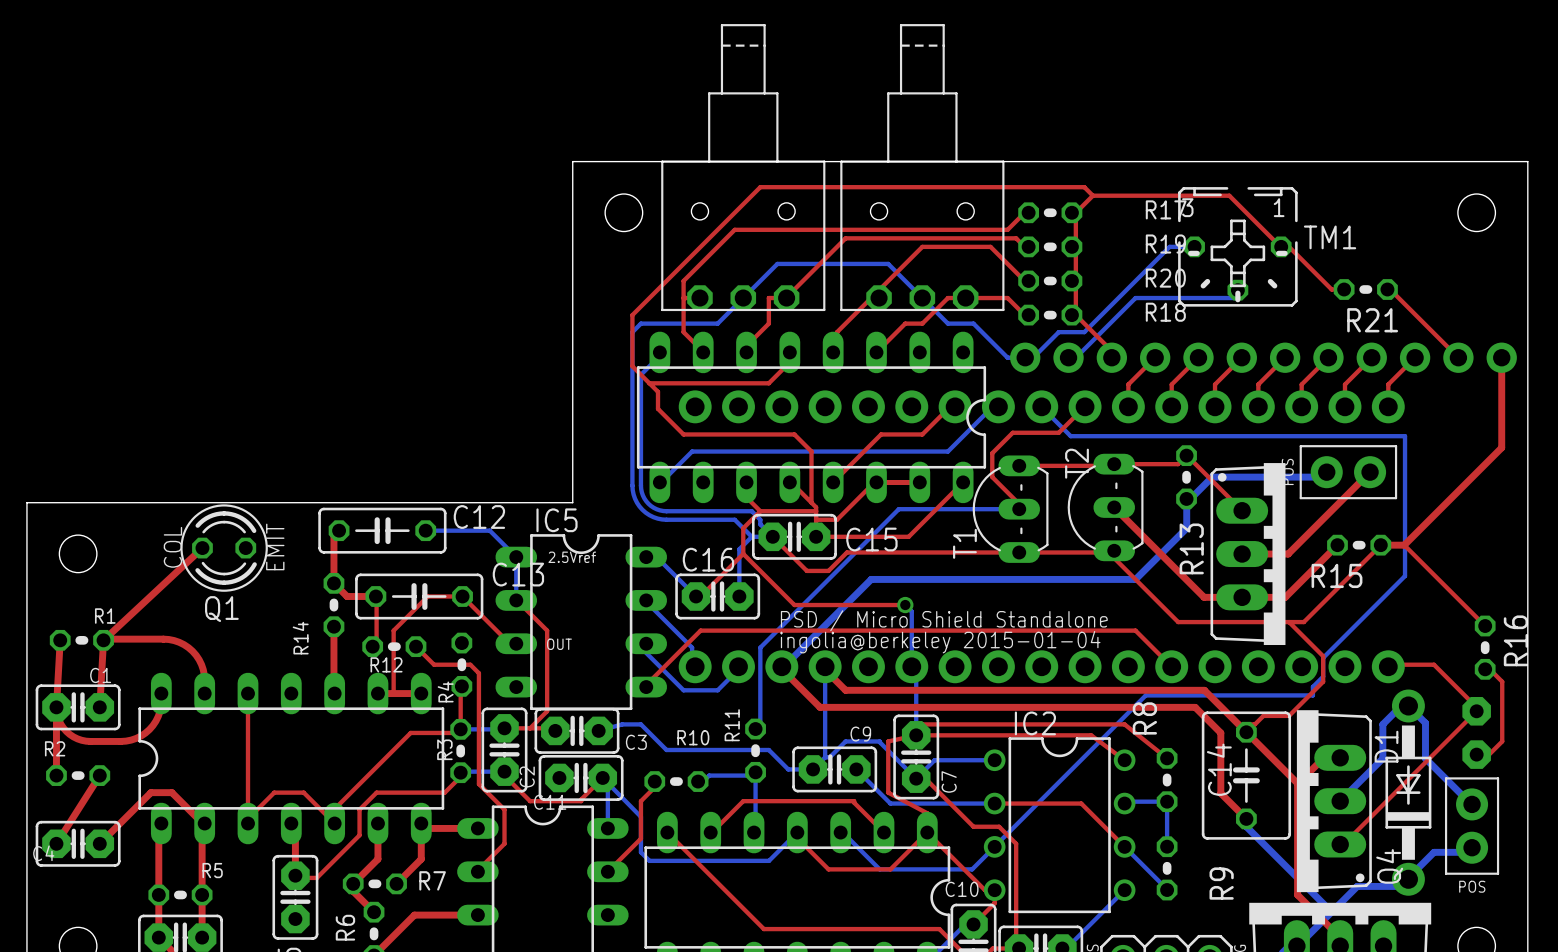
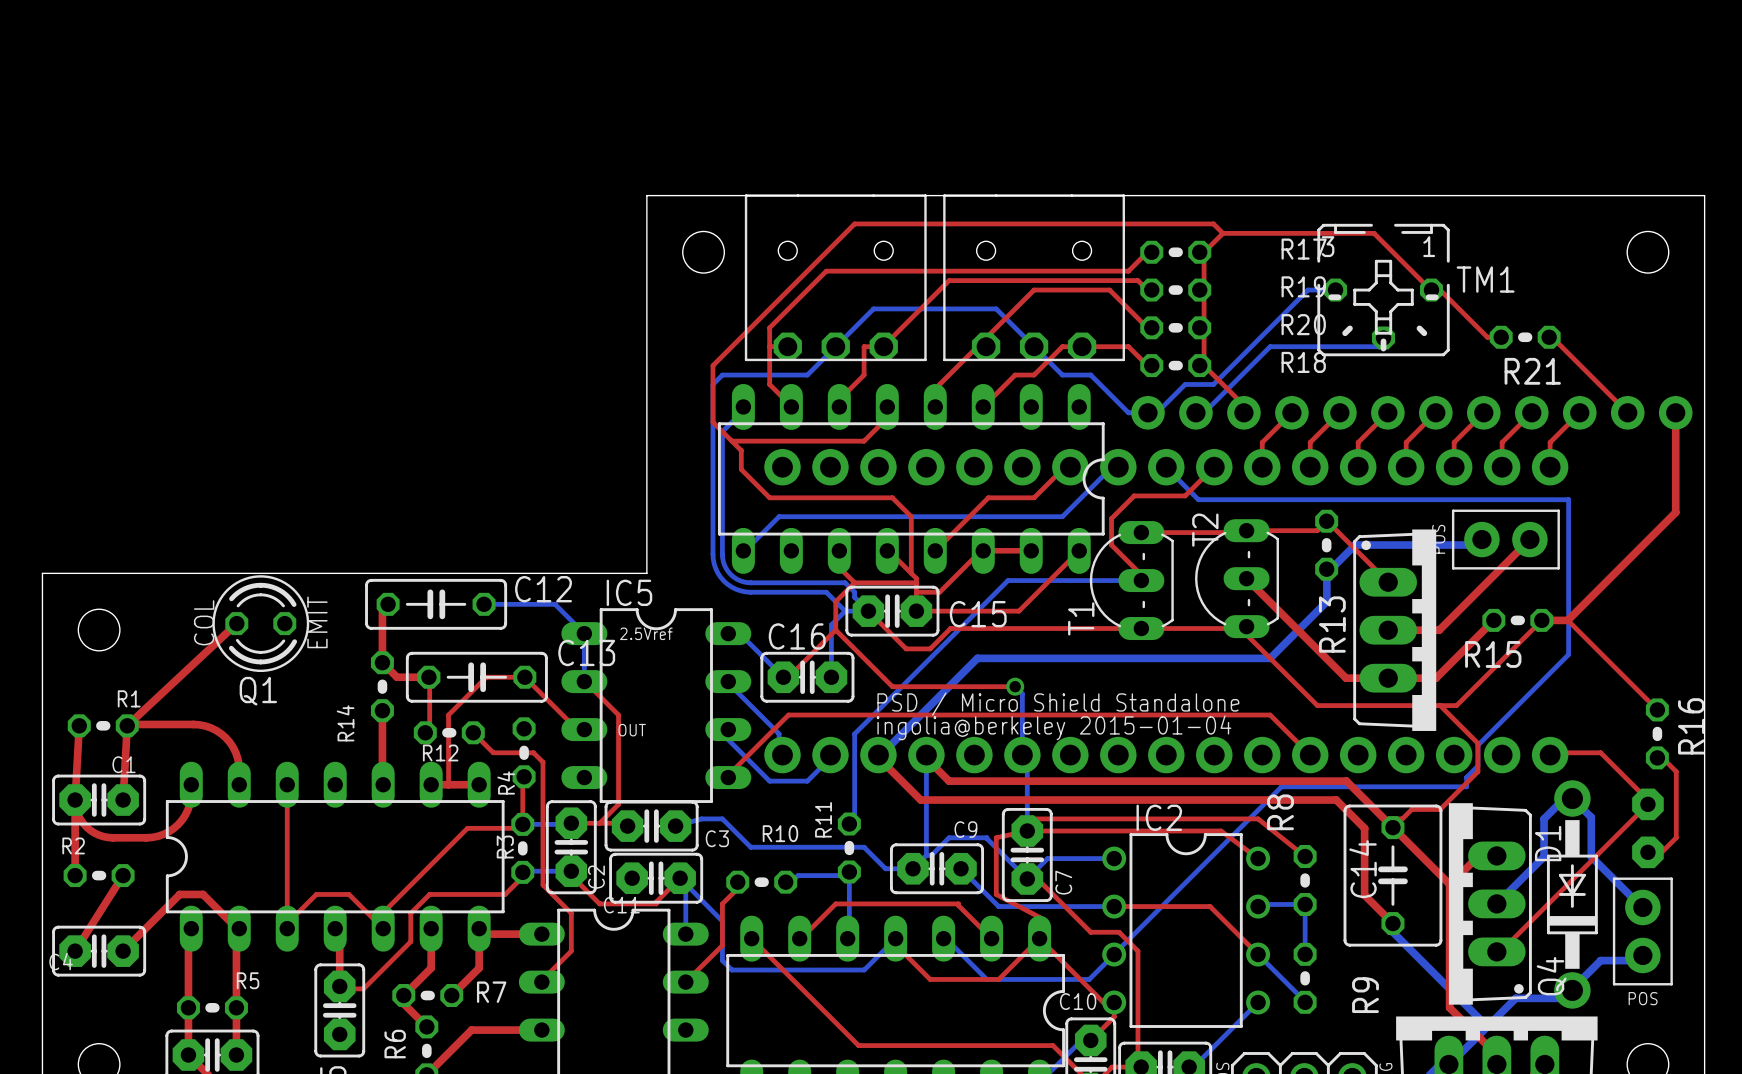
part: (743, 167) -> none
part: (922, 167) -> none
part: none -> (835, 277)
part: none -> (1034, 277)

